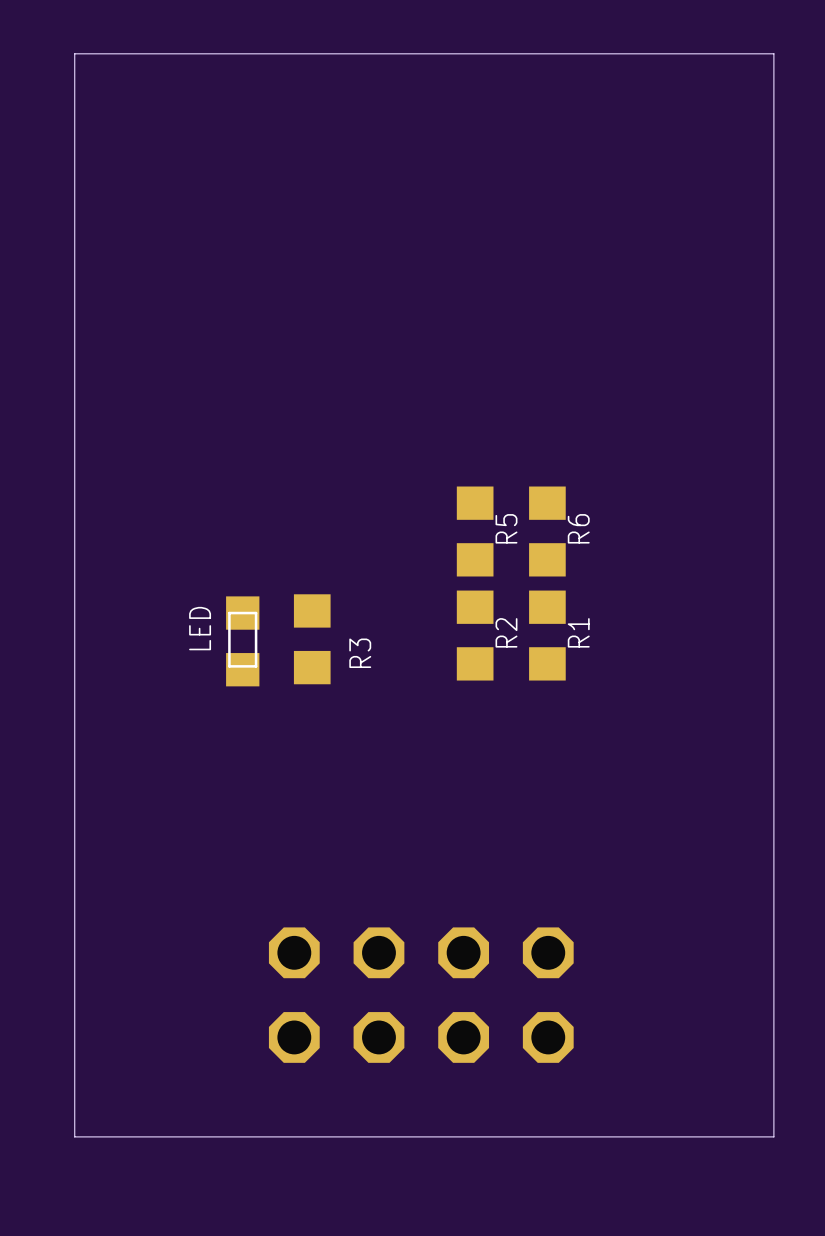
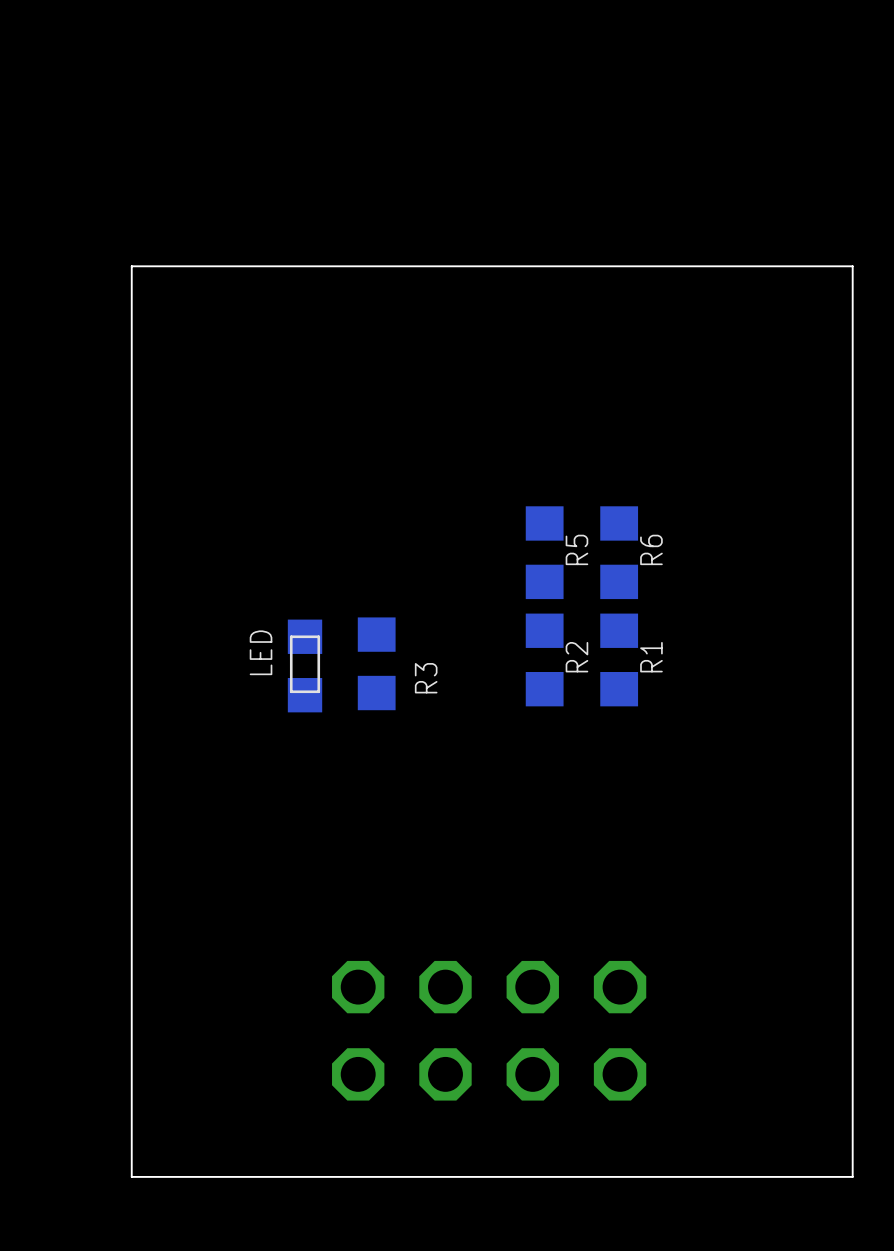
board edge: (773, 253) (773, 53) (74, 53) (74, 253) -> (852, 266) (131, 266)

